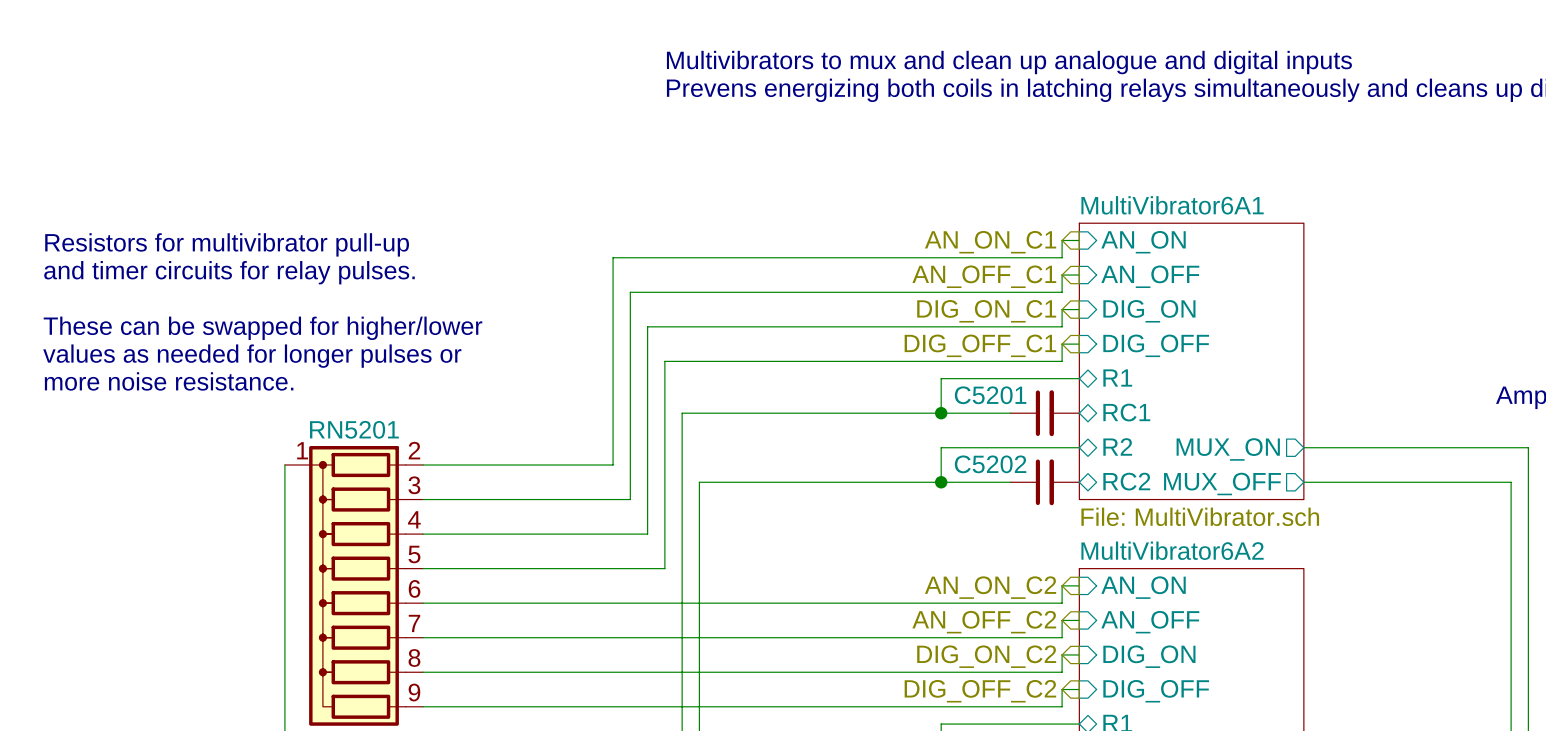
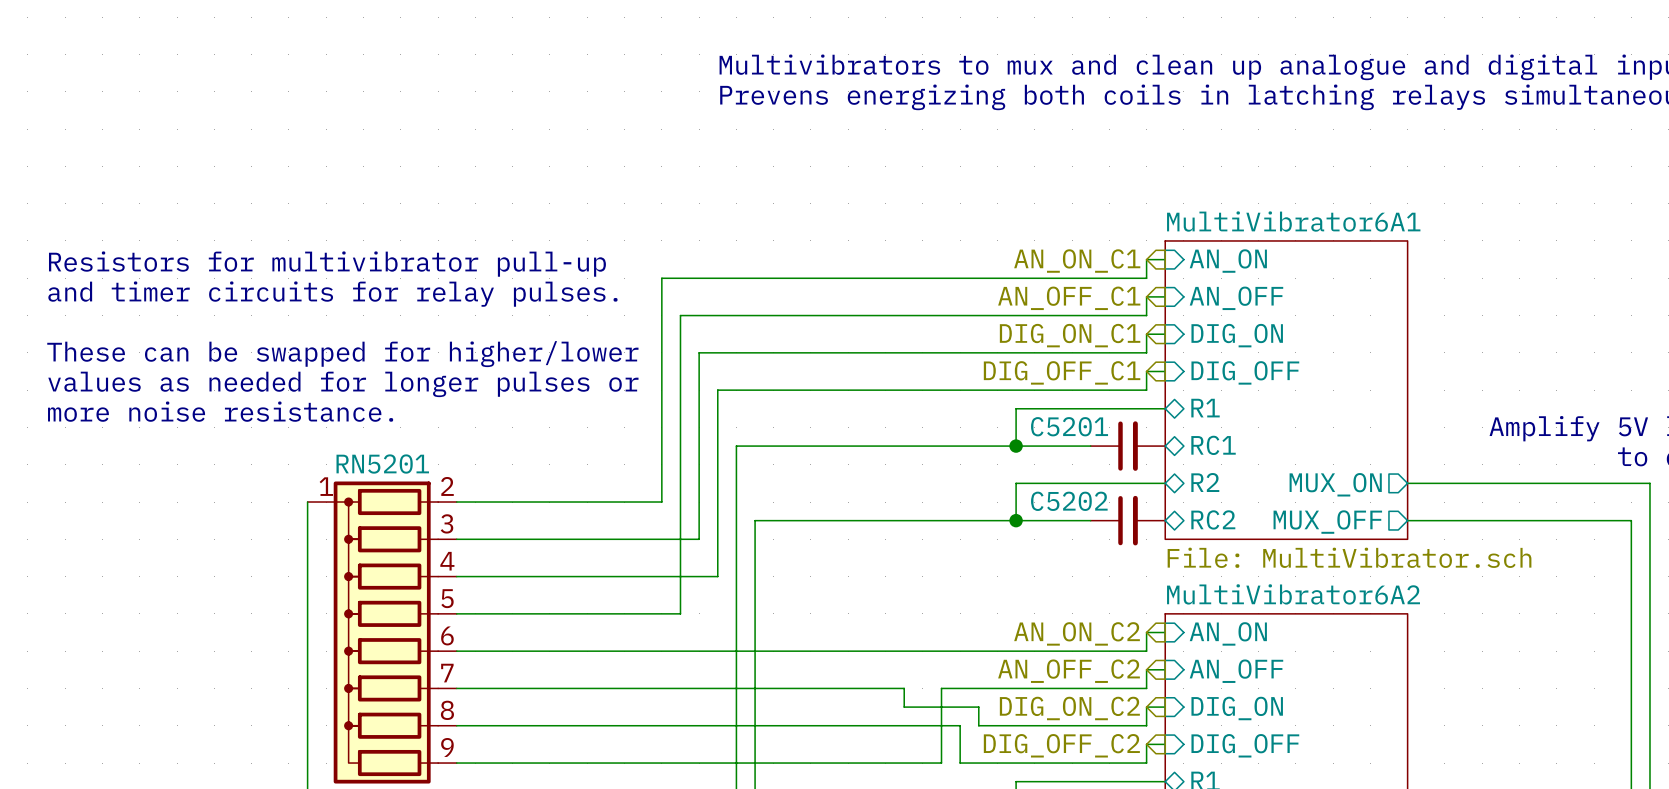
wire: (647, 499) (647, 534) -> (699, 539) (680, 539) (680, 613)
wire: (664, 534) (664, 568) (630, 568) -> (717, 576) (699, 576)
wire: (837, 637) (872, 637) -> (904, 688) (904, 707) (978, 707) (978, 725)
wire: none -> (941, 688) (941, 763)
wire: (889, 672) (906, 672) -> none
wire: (872, 706) (889, 706) -> (960, 725) (960, 763)

